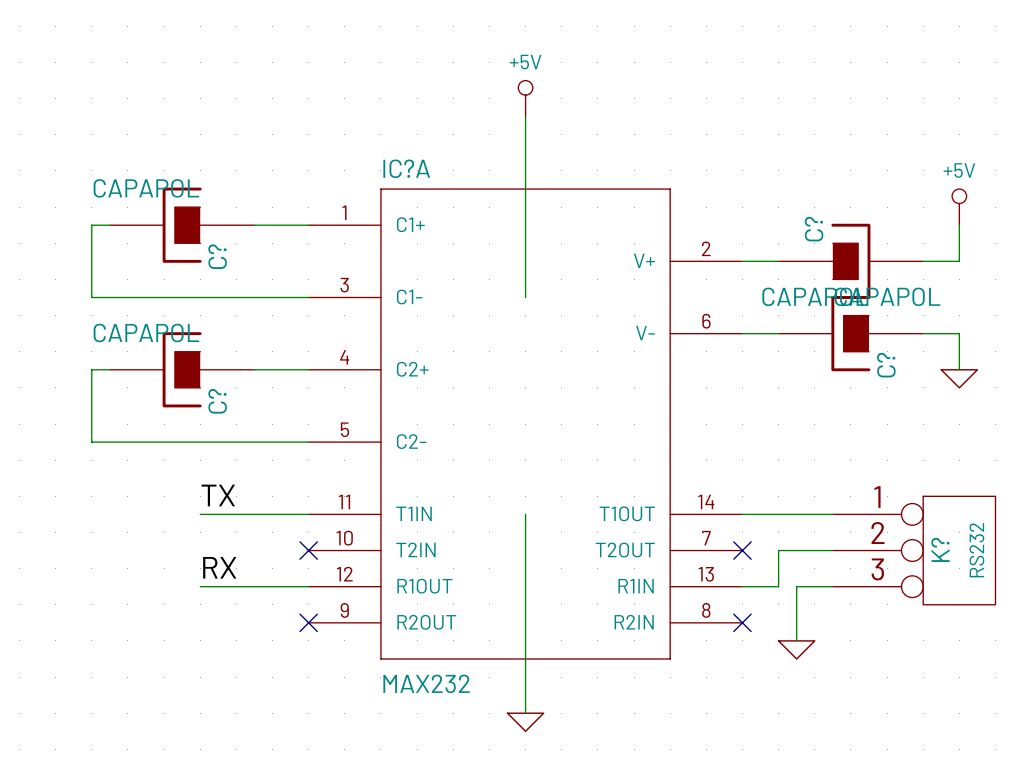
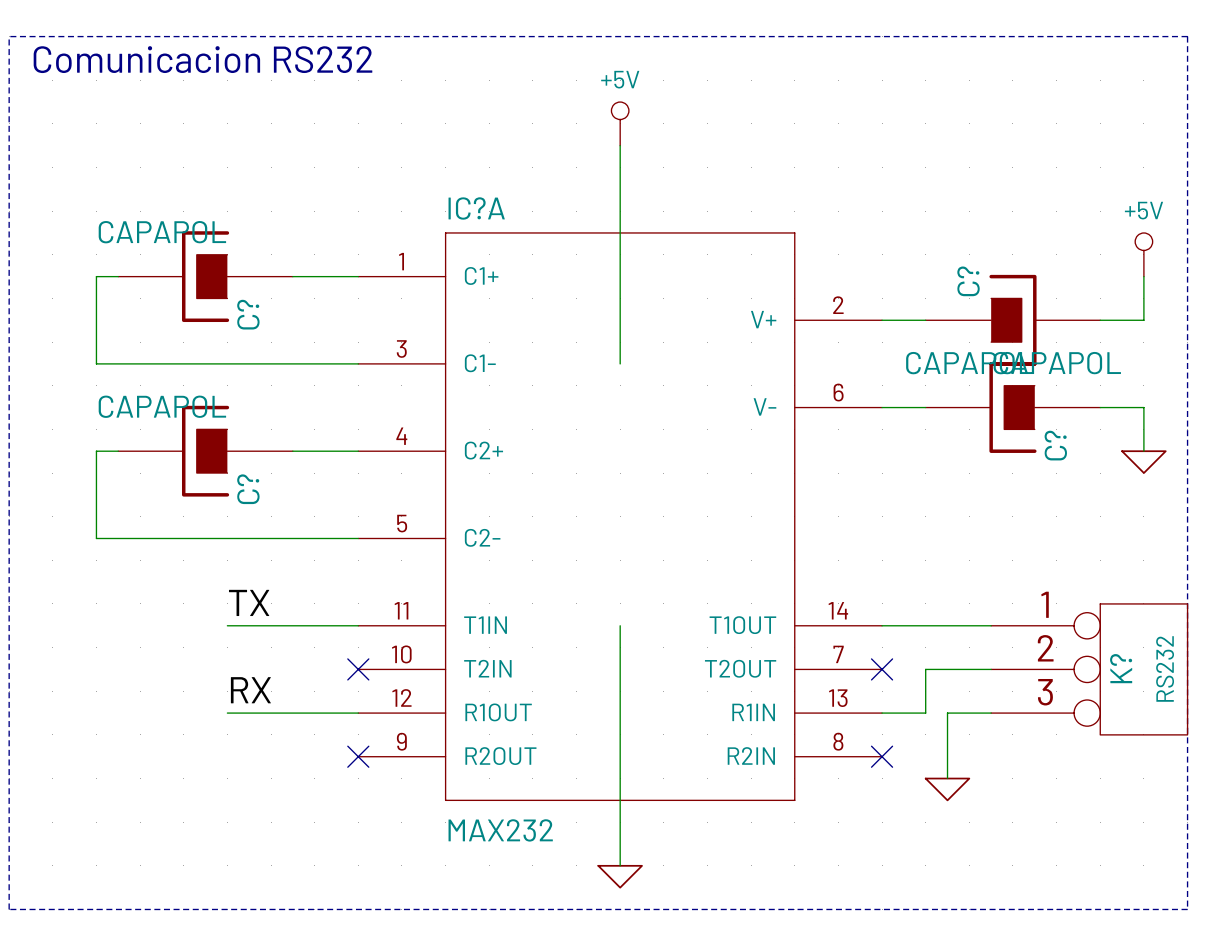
line: none -> (9, 36) (1187, 36) (1187, 909) (9, 909) (9, 36)
text: none -> Comunicacion RS232 (202, 59)

